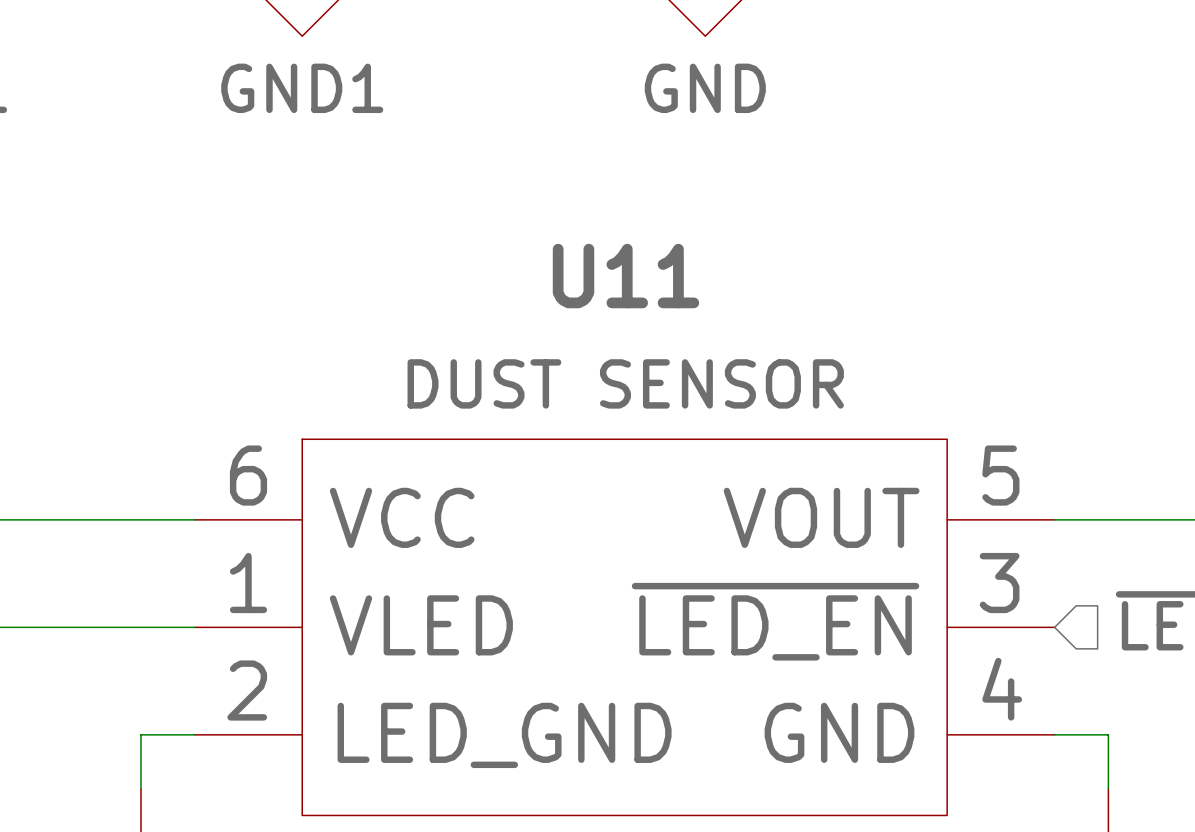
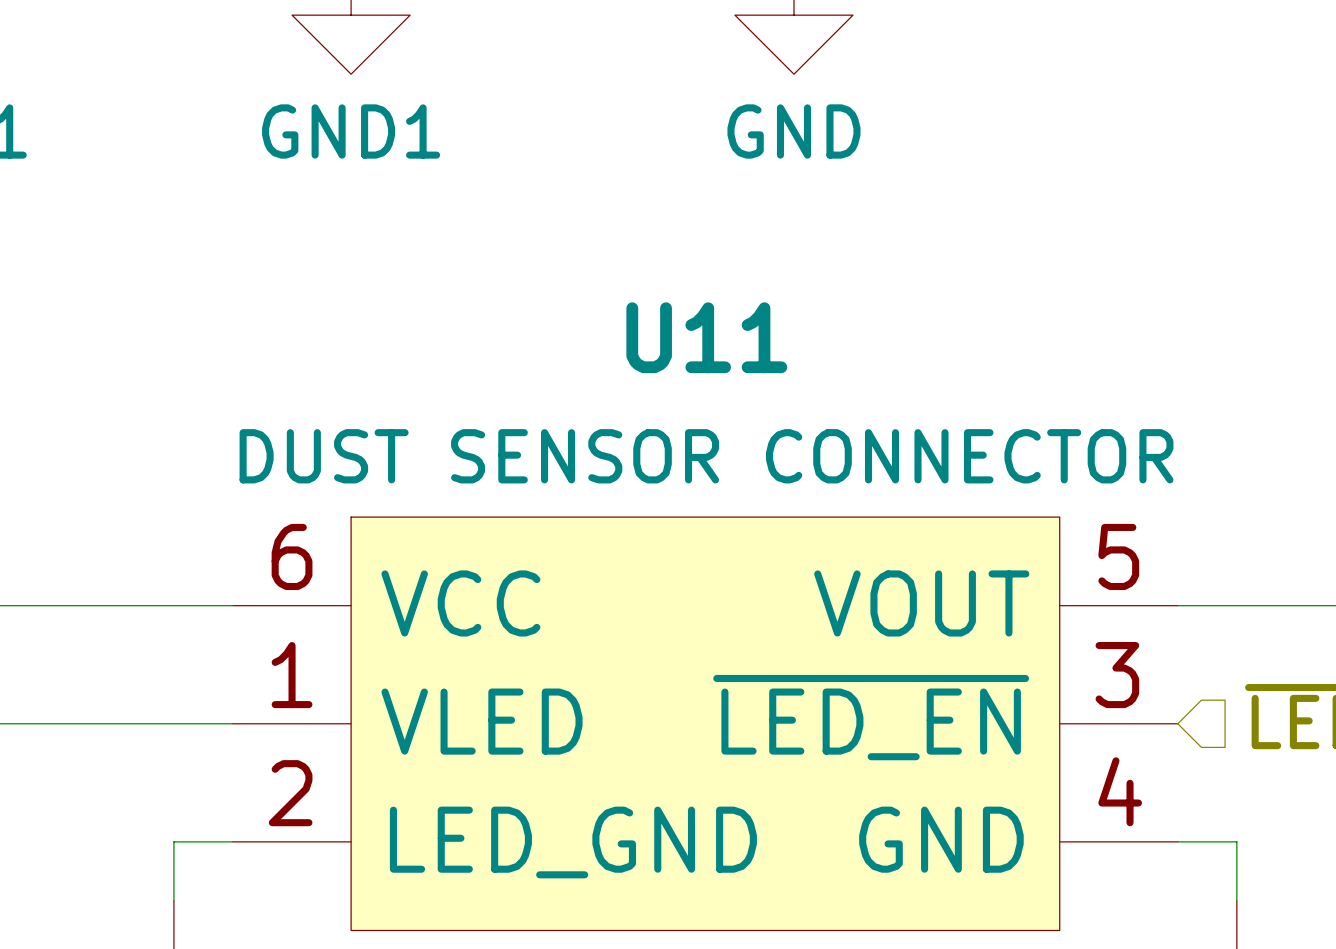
U11 value: DUST SENSOR (625, 383) -> DUST SENSOR CONNECTOR (706, 456)

